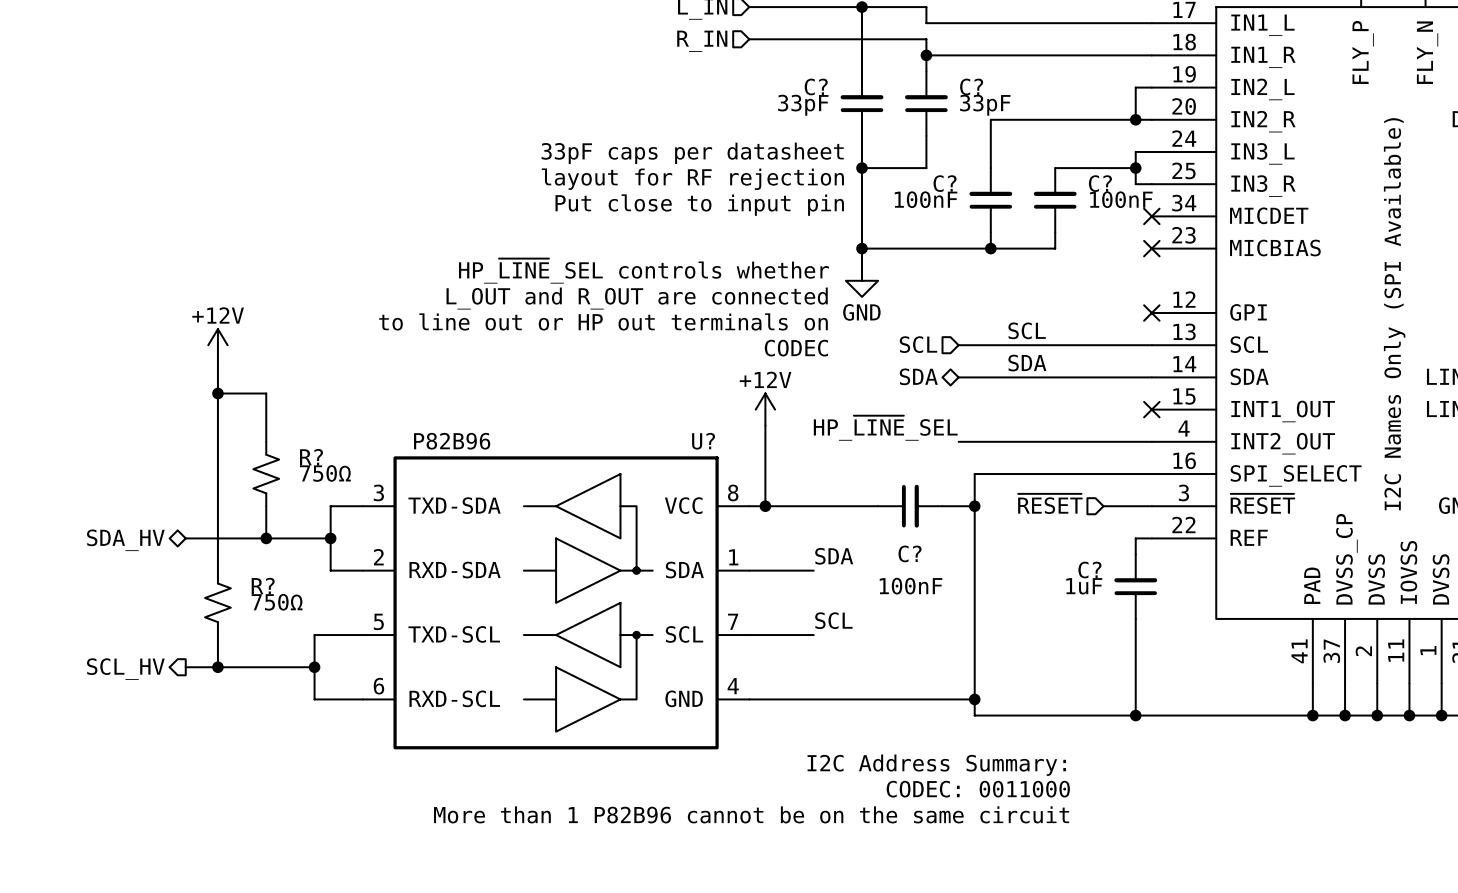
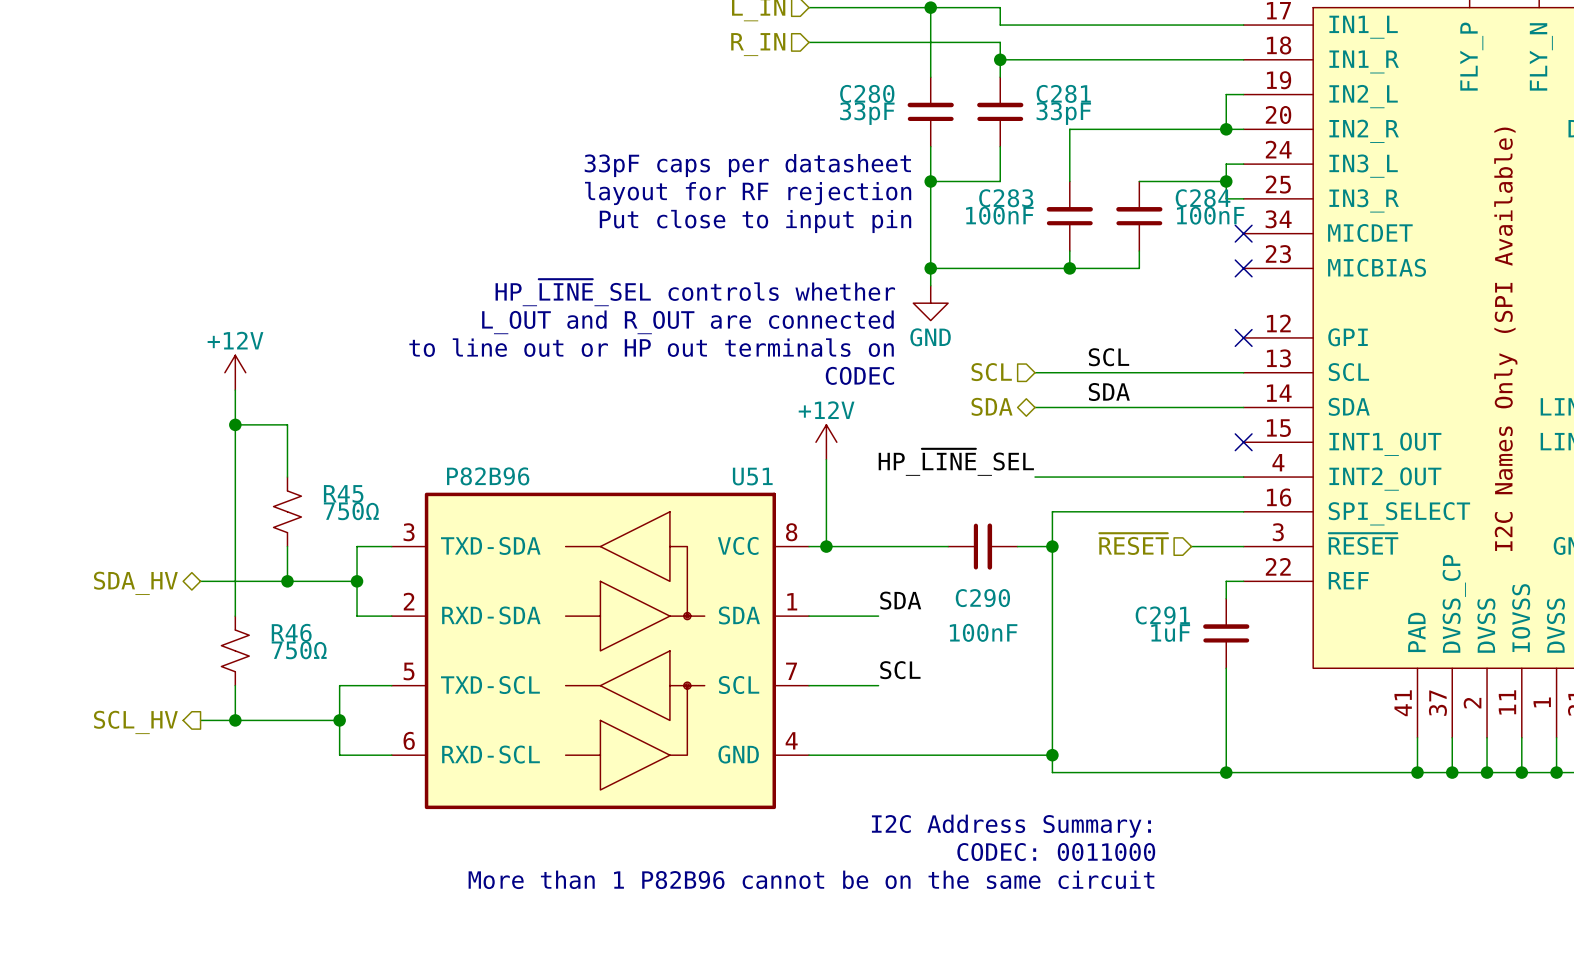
C? name: C? (816, 87) -> C280 (867, 93)
C? name: C? (971, 87) -> C281 (1063, 93)
C? name: C? (945, 183) -> C283 (1006, 198)
C? name: C? (1100, 183) -> C284 (1203, 198)
U? name: U? (703, 441) -> U51 (752, 476)
R? name: R? (311, 457) -> R45 (343, 493)
C? name: C? (910, 553) -> C290 (982, 598)
C? name: C? (1089, 570) -> C291 (1162, 615)
R? name: R? (263, 585) -> R46 (291, 632)

